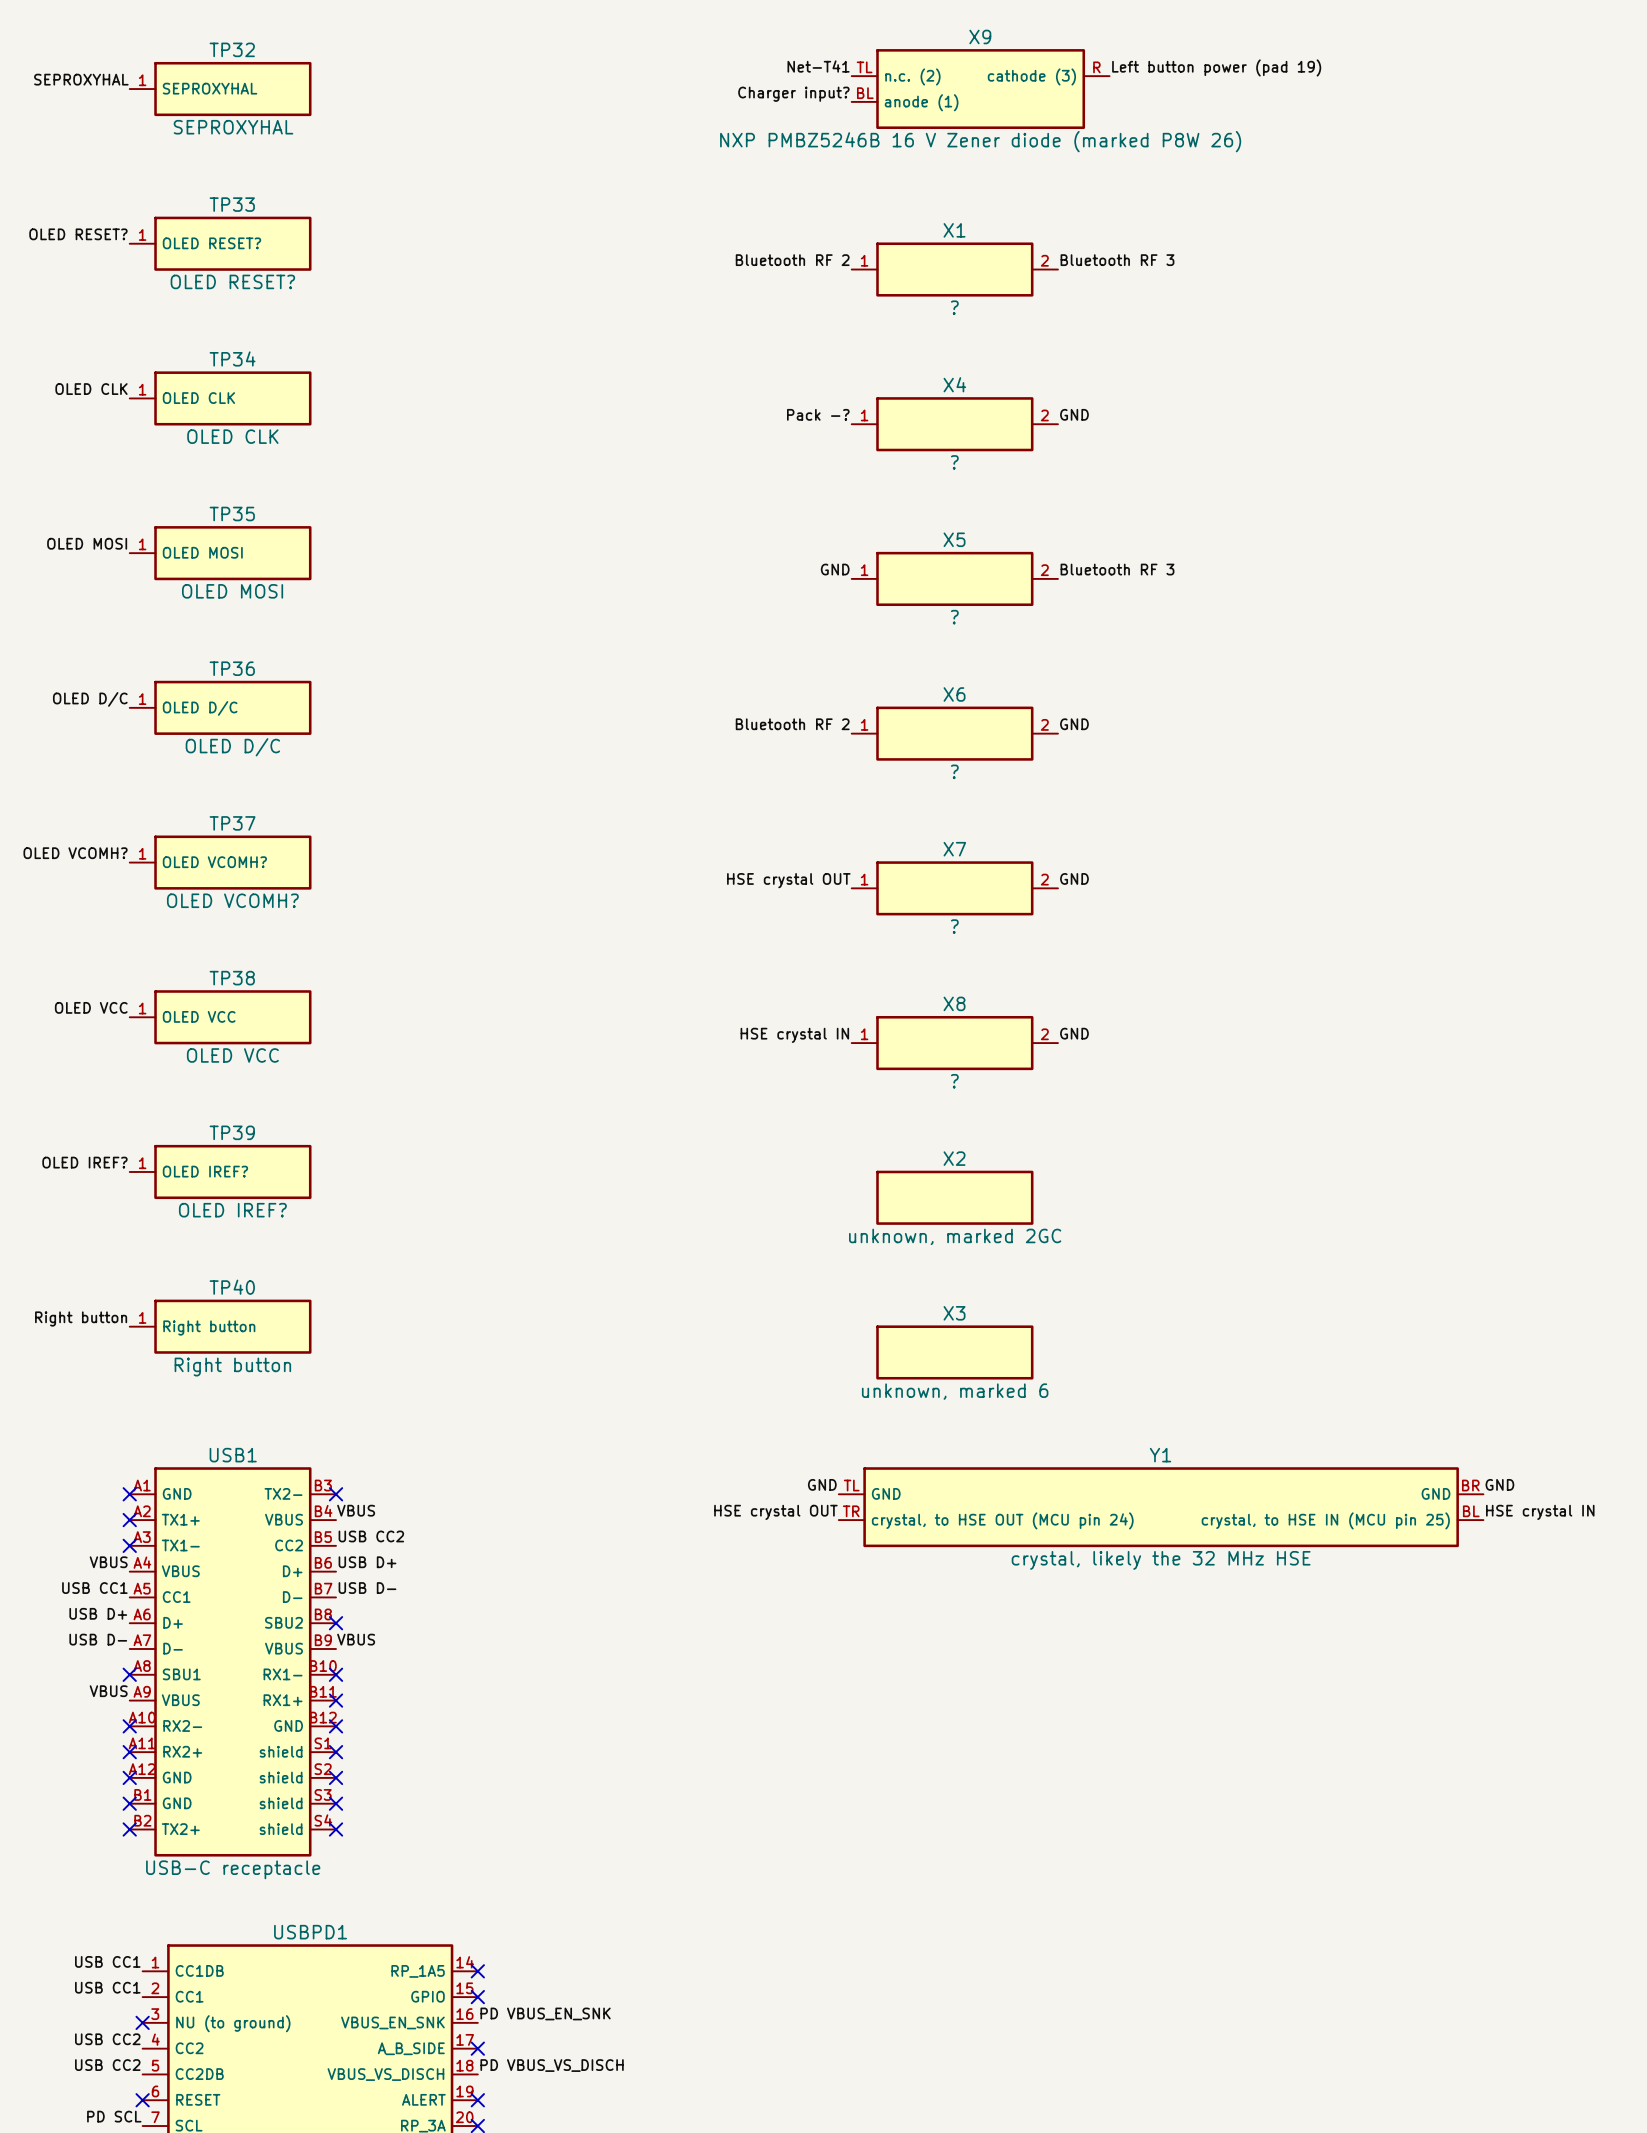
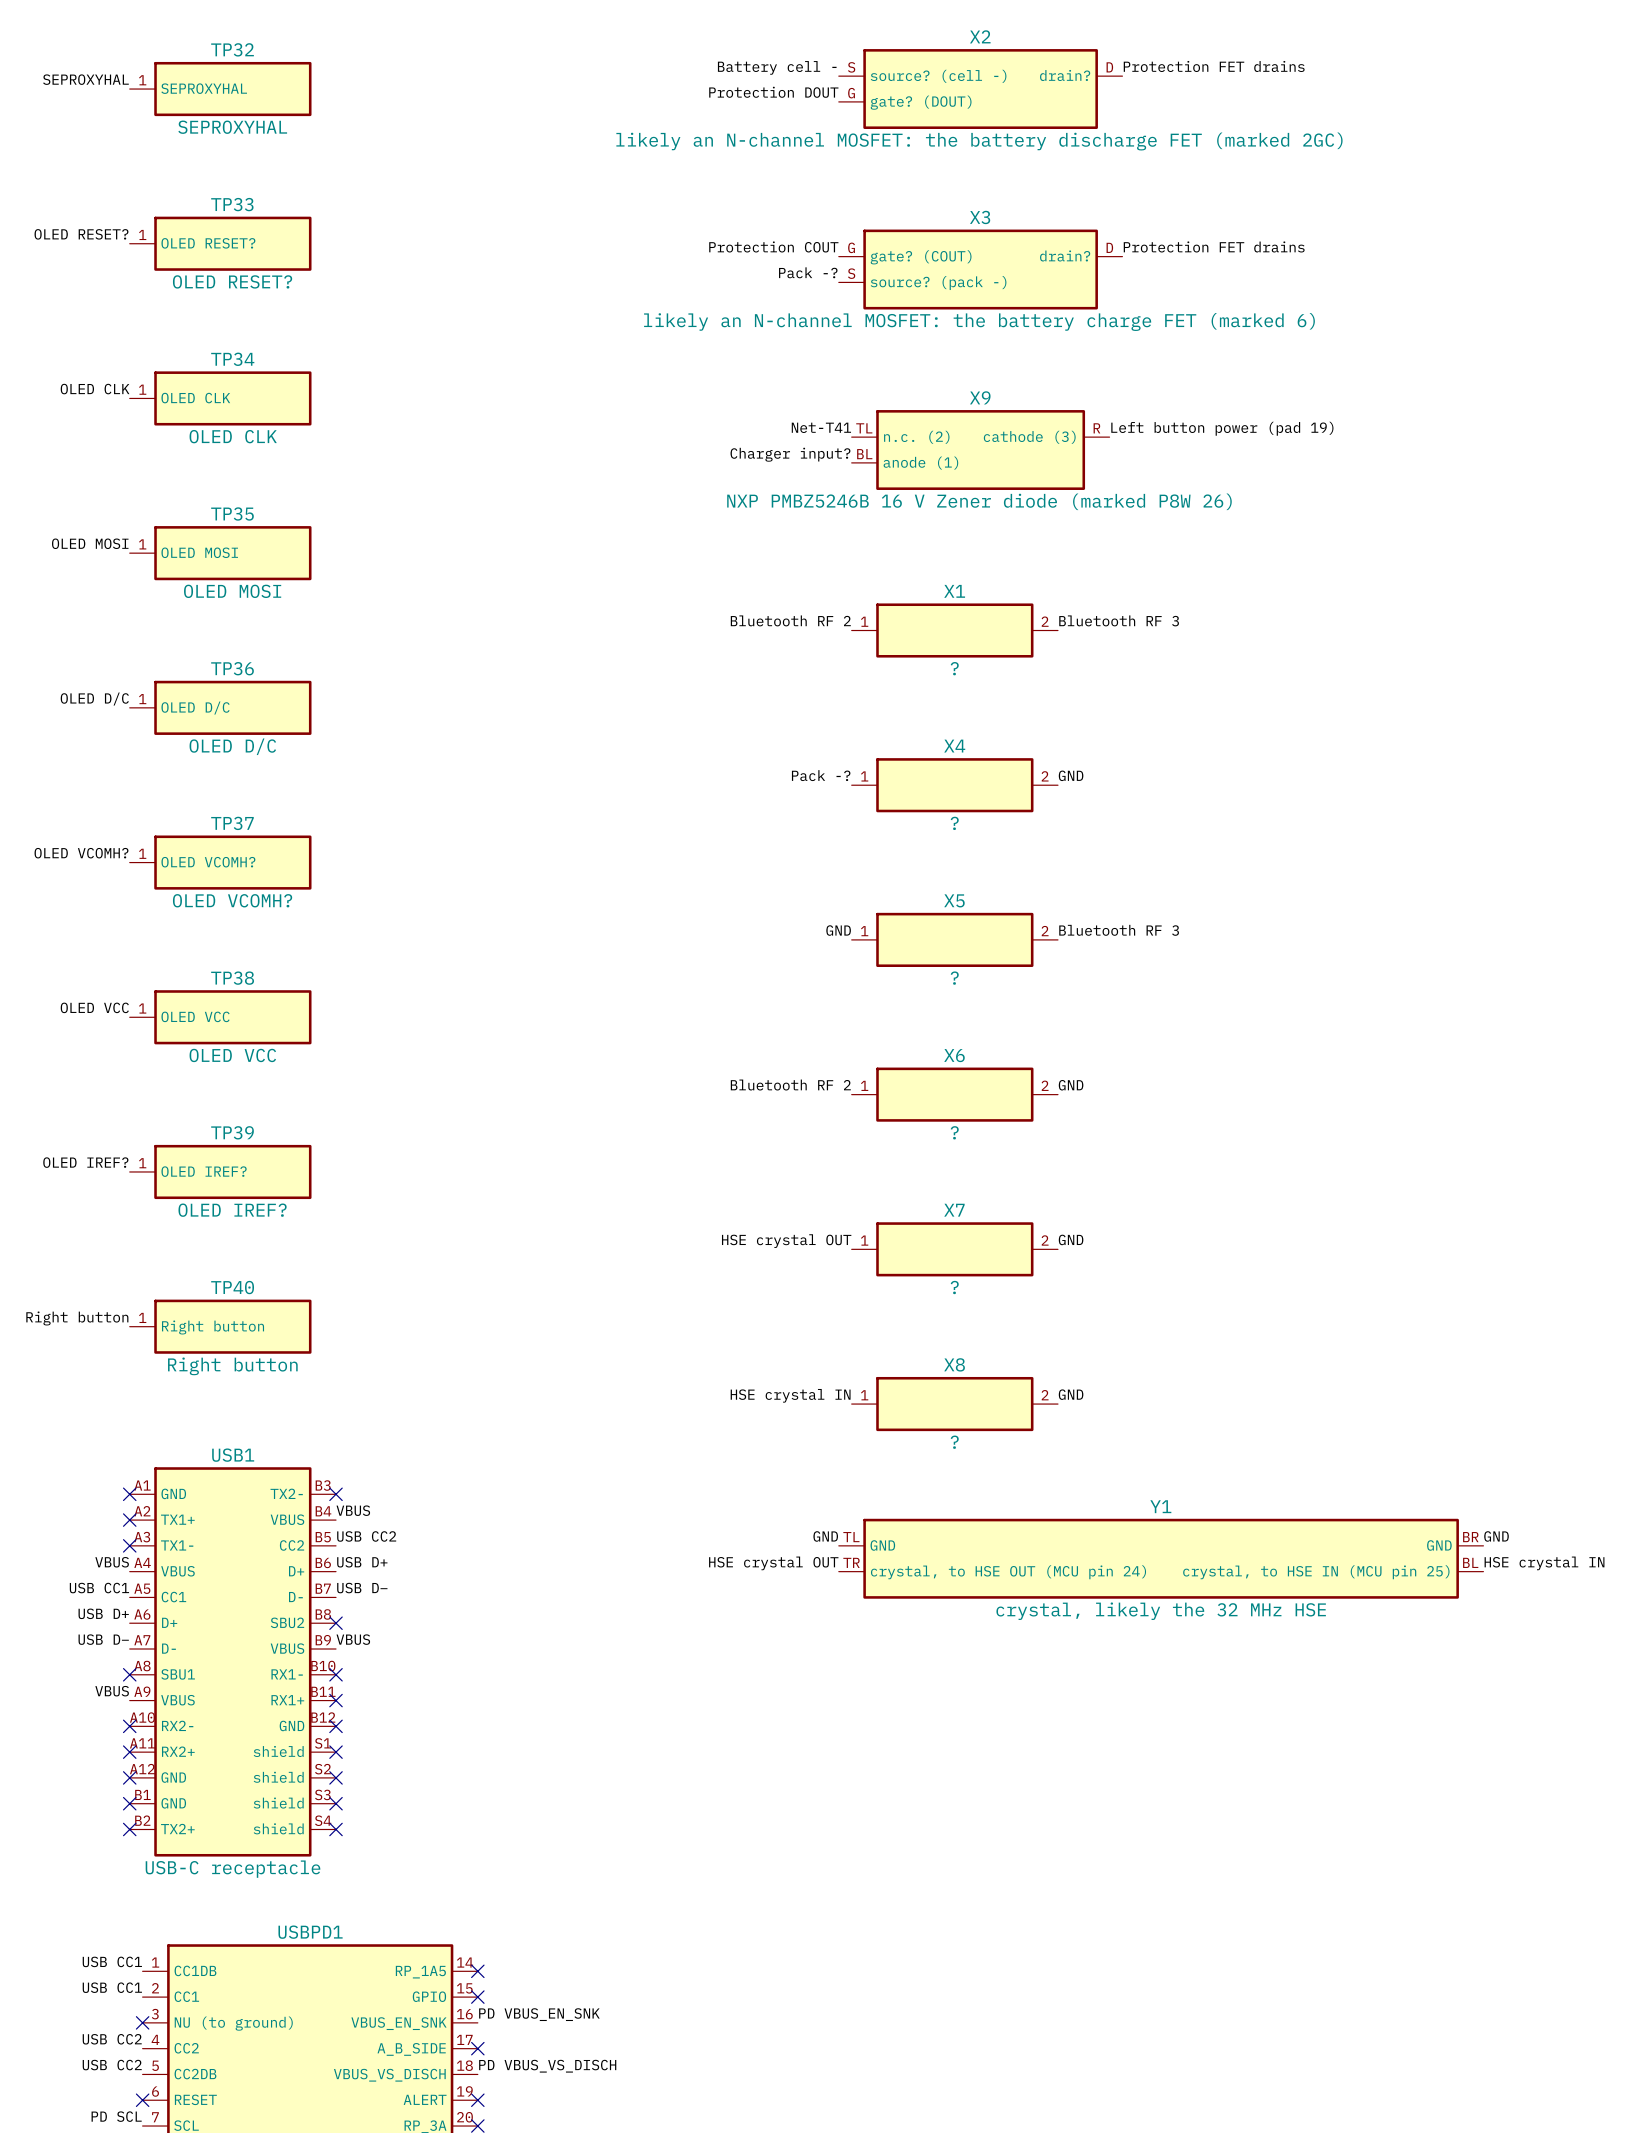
label: Net-T41 (818, 66) -> none
label: none -> Protection FET drains (1214, 66)
label: Left button power (pad 19) (1216, 67) -> none
label: none -> Battery cell - (777, 67)
X9 position: (980, 89) -> (980, 450)
label: none -> Protection DOUT (773, 92)
label: Charger input? (793, 94) -> none
label: none -> Protection COUT (773, 246)
label: none -> Protection FET drains (1214, 246)
label: Bluetooth RF 2 (792, 260) -> none
label: Bluetooth RF 3 (1117, 260) -> none
X1 position: (954, 269) -> (954, 630)
label position: Pack -? (818, 414) -> Pack -? (808, 272)
label: GND (1074, 414) -> none
X4 position: (954, 424) -> (954, 785)
label: none -> Net-T41 (821, 427)
label: none -> Left button power (pad 19) (1222, 428)
label: none -> Charger input? (790, 454)
label: GND (835, 569) -> none
label position: Bluetooth RF 3 (1117, 569) -> Bluetooth RF 3 (1119, 620)
X5 position: (954, 578) -> (954, 939)
label position: Bluetooth RF 2 (792, 724) -> Bluetooth RF 2 (790, 620)
label: GND (1074, 724) -> none
X6 position: (954, 733) -> (954, 1094)
label: none -> Pack -? (821, 775)
label: none -> GND (1071, 775)
label: GND (1074, 878) -> none
label: HSE crystal OUT (788, 880) -> none
X7 position: (954, 888) -> (954, 1249)
label: none -> GND (838, 930)
label: none -> Bluetooth RF 3 (1119, 930)
label position: GND (1074, 1033) -> GND (1071, 1085)
label: HSE crystal IN (794, 1035) -> none
X8 position: (954, 1043) -> (954, 1404)
label: none -> Bluetooth RF 2 (790, 1085)
X2 symbol: [876, 1170, 1034, 1225] -> [838, 49, 1123, 129]
X2 value: unknown, marked 2GC (955, 1236) -> likely an N-channel MOSFET: the battery discharge FET (marked 2GC) (979, 141)
label: none -> GND (1071, 1239)
label: none -> HSE crystal OUT (786, 1241)
X3 symbol: [876, 1325, 1034, 1380] -> [838, 229, 1123, 310]
X3 value: unknown, marked 6 (955, 1391) -> likely an N-channel MOSFET: the battery charge FET (marked 6) (979, 321)
label: none -> GND (1071, 1394)
label: none -> HSE crystal IN (790, 1395)
label position: GND (822, 1484) -> GND (825, 1536)
label position: GND (1499, 1484) -> GND (1496, 1536)
Y1 position: (1161, 1507) -> (1161, 1558)
label position: HSE crystal OUT (775, 1512) -> HSE crystal OUT (773, 1563)
label position: HSE crystal IN (1540, 1512) -> HSE crystal IN (1544, 1563)

